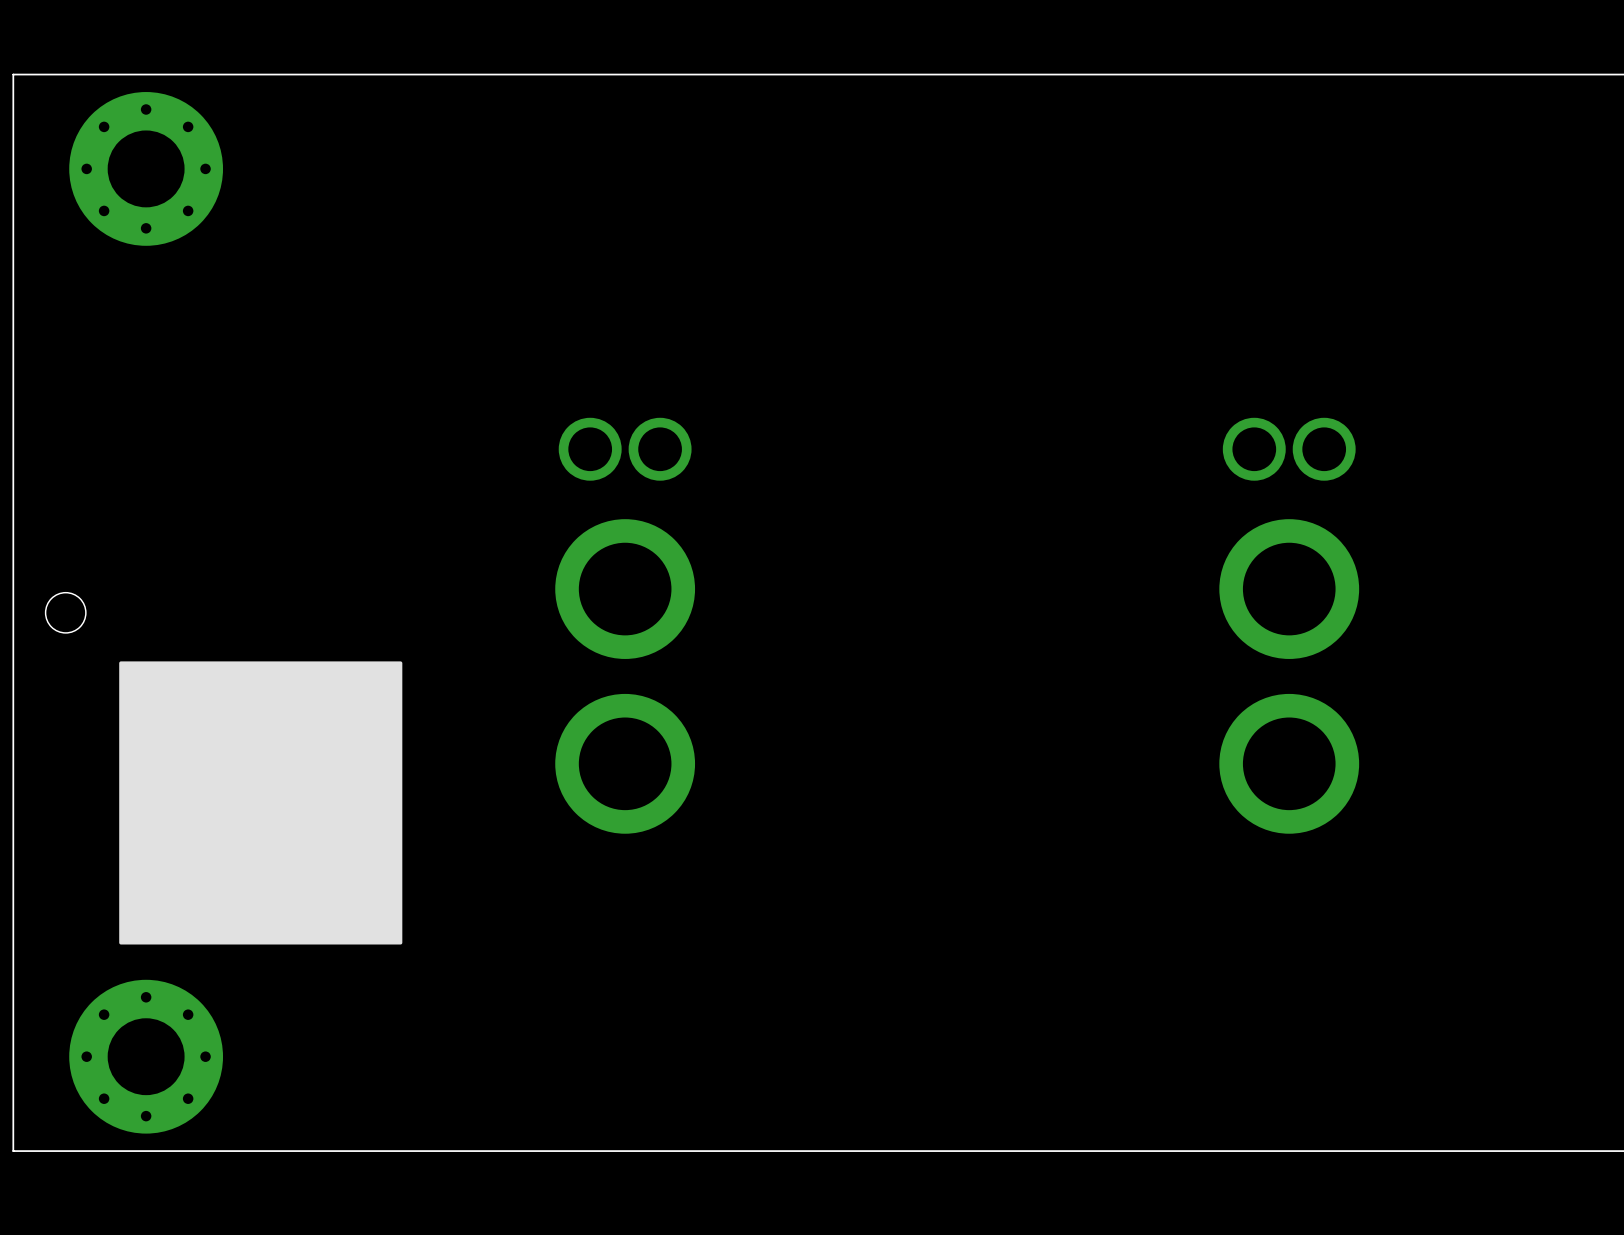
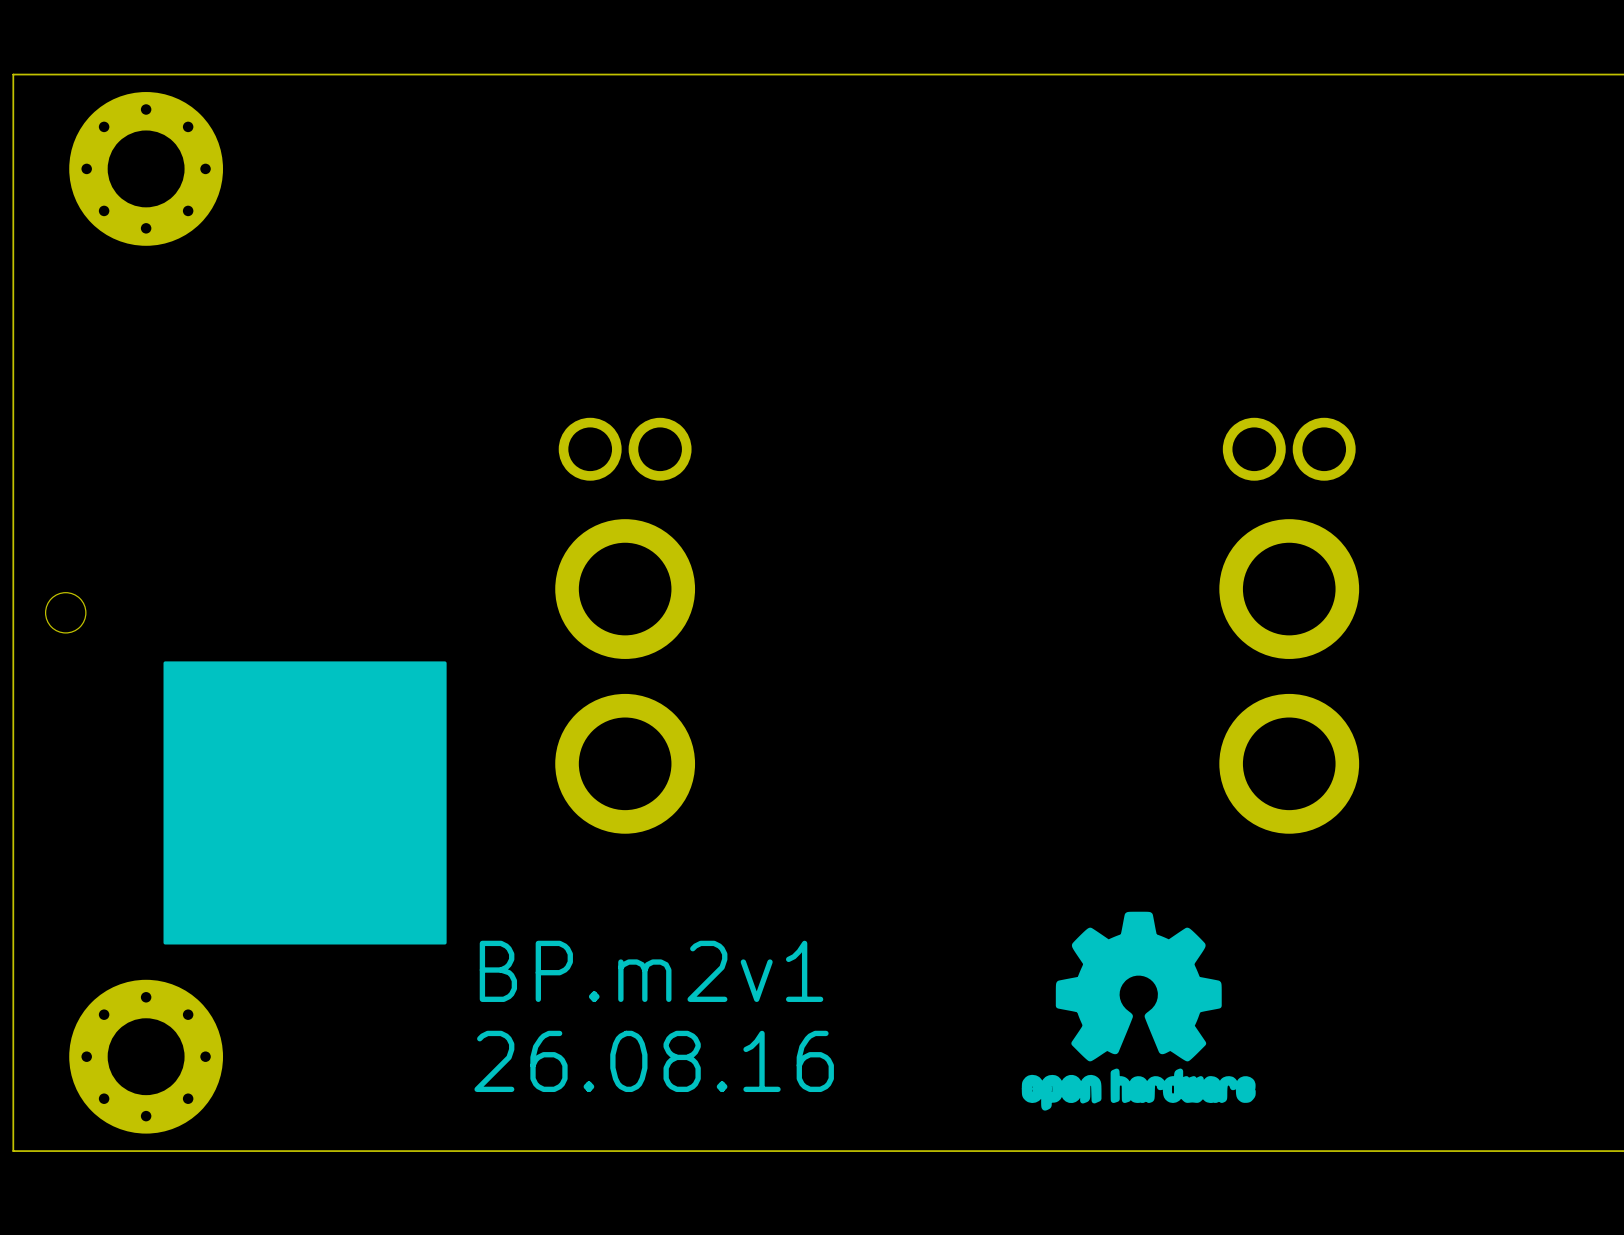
drawing position: (260, 802) -> (305, 802)
drawing: none -> [1021, 911, 1256, 1111]
text: none -> BP.m2v1 (651, 971)
text: none -> 26.08.16 (654, 1061)

